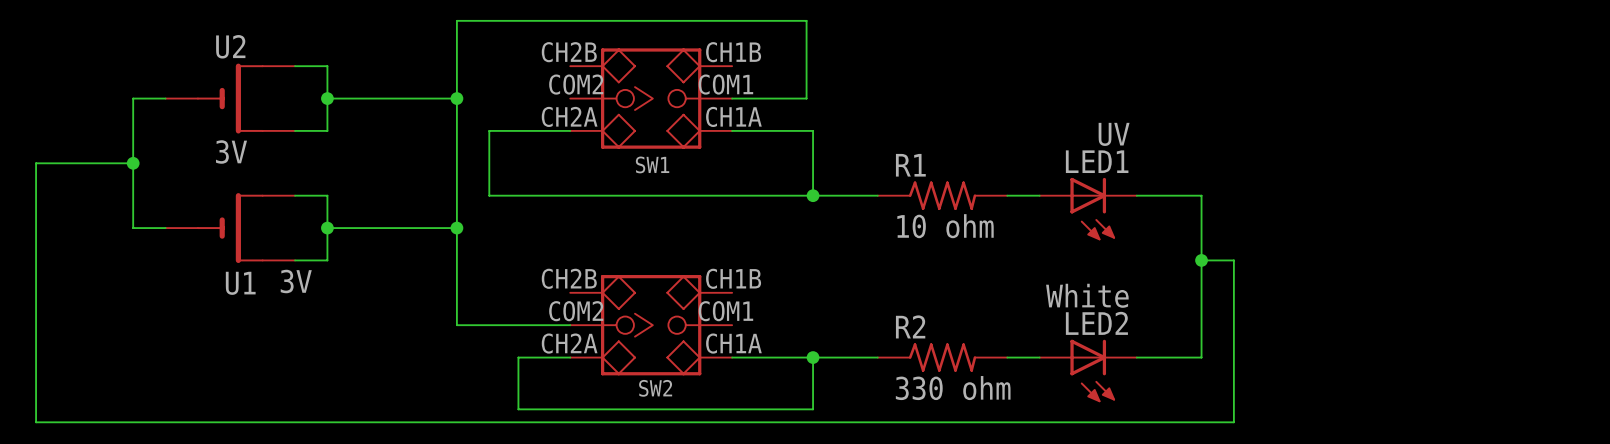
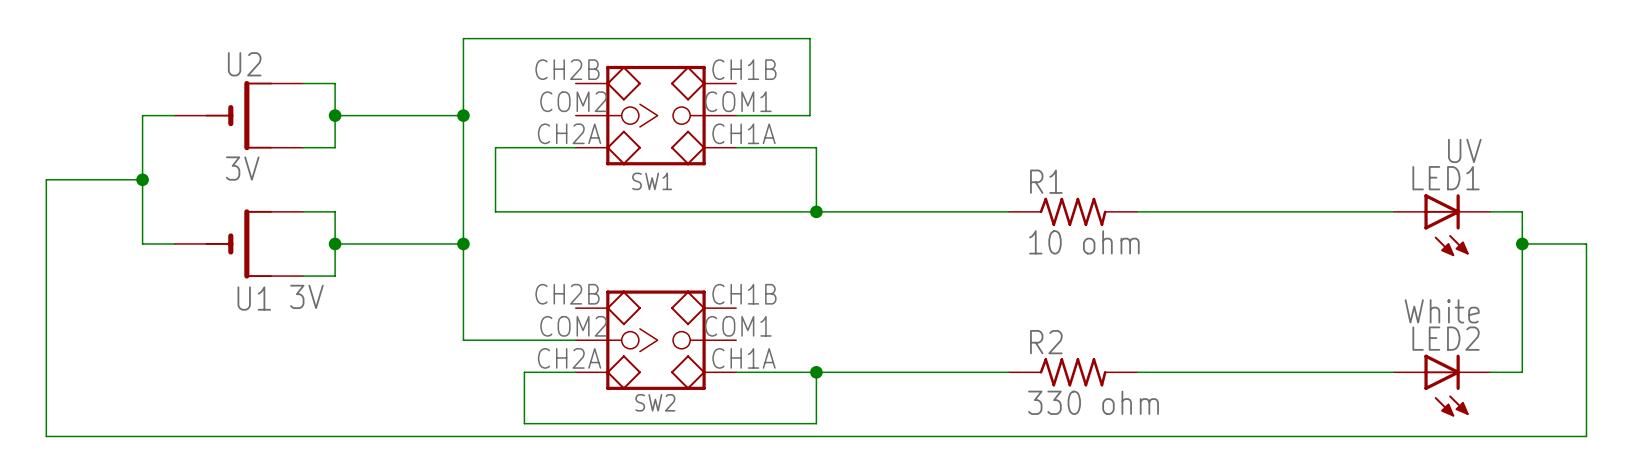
R1 position: (942, 195) -> (1073, 211)
wire: (1201, 195) (1201, 357) -> (1201, 211) (1393, 211)
wire: none -> (1490, 211) (1522, 211) (1522, 372) (1490, 372)
LED1 position: (1088, 209) -> (1442, 225)
junction: none -> (1522, 243)
wire: (1201, 260) (1233, 260) (1233, 422) -> (1522, 243) (1586, 243) (1586, 436) (1233, 436)
junction: (1201, 260) -> none
R2 position: (942, 357) -> (1073, 372)
wire: none -> (1201, 372) (1393, 372)
LED2 position: (1088, 370) -> (1442, 385)

